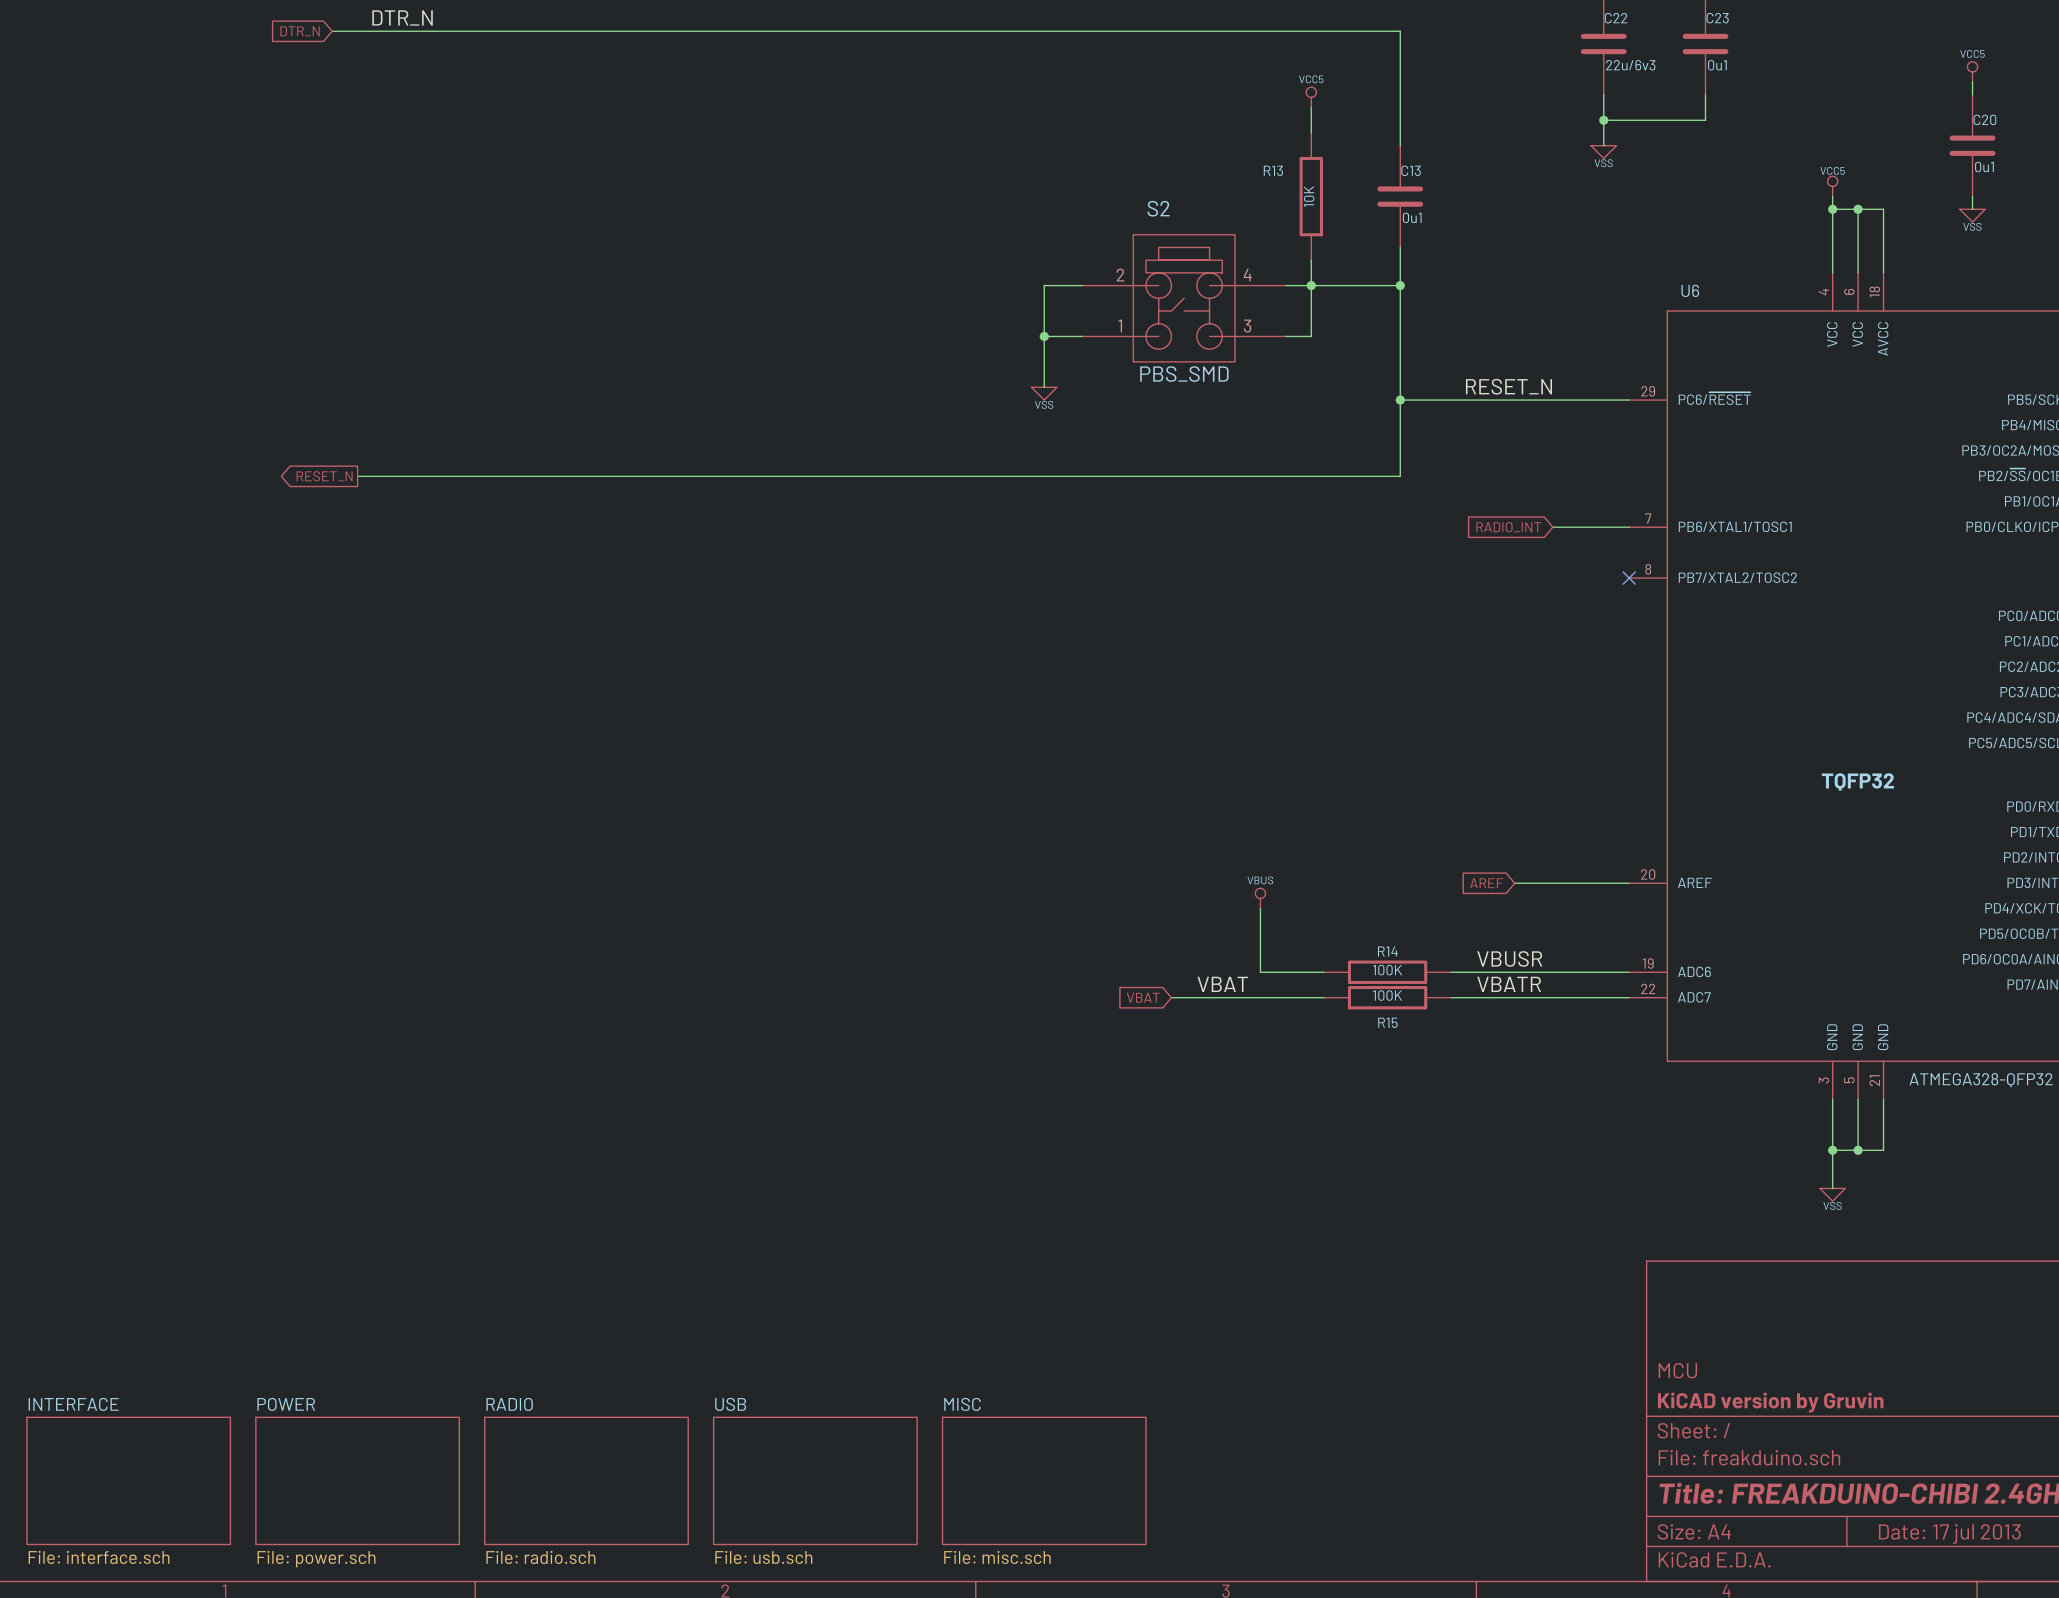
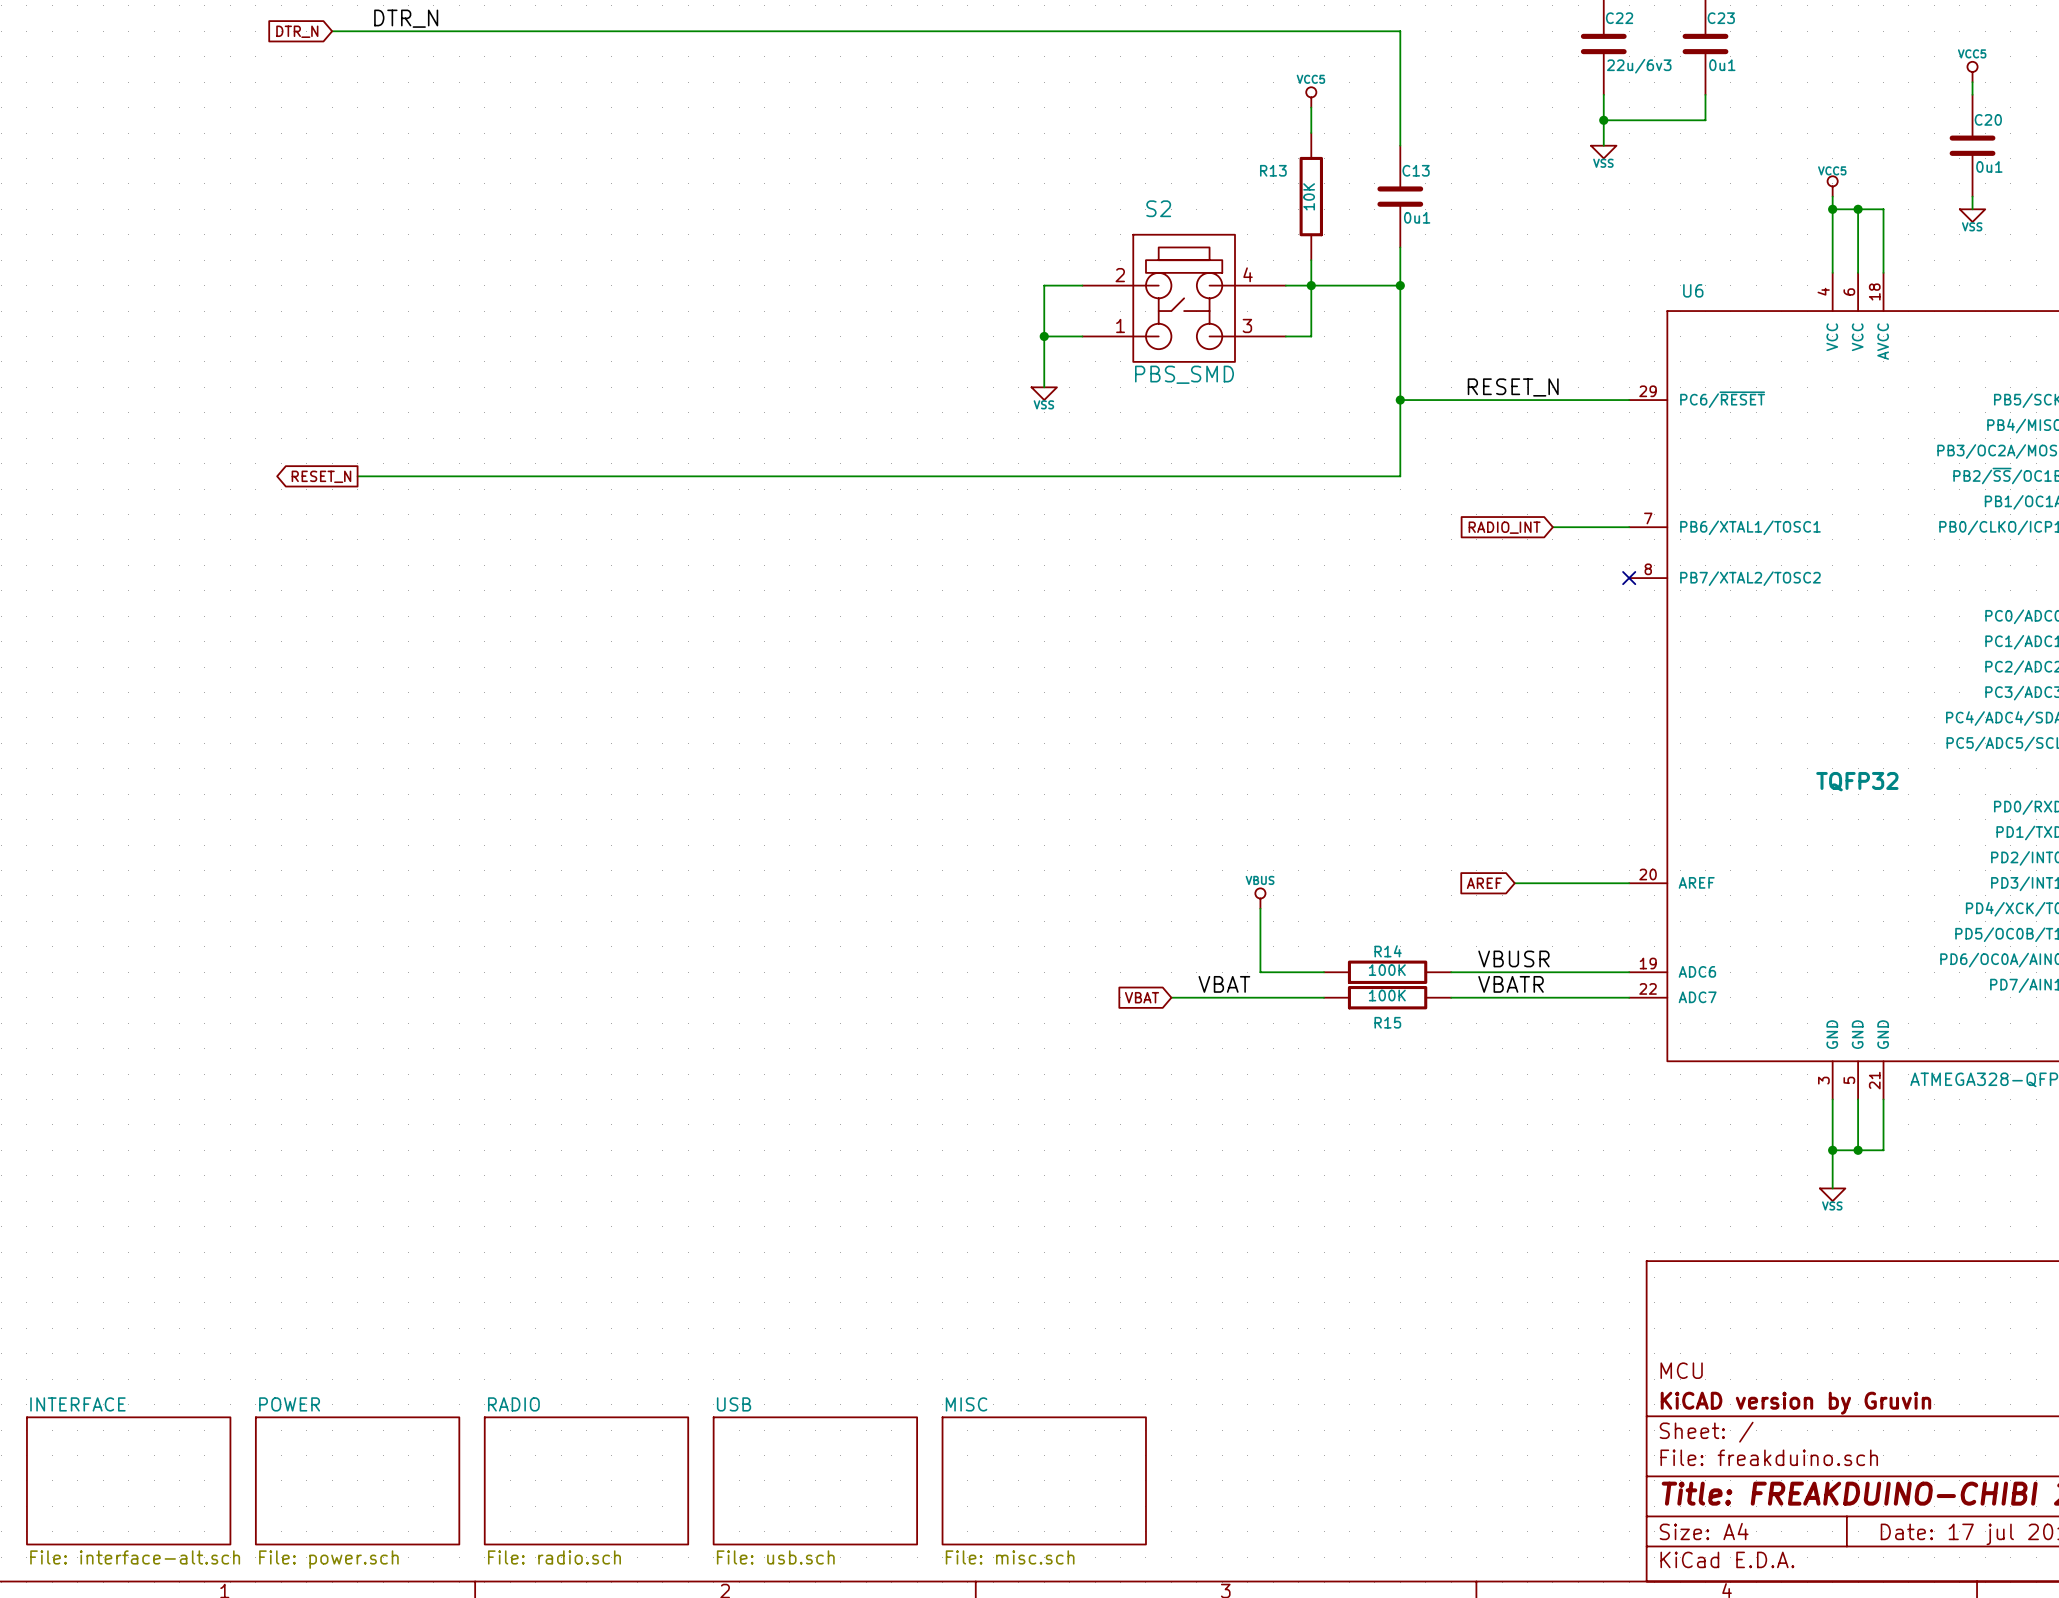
sheet INTERFACE value: File: interface.sch (99, 1557) -> File: interface-alt.sch (135, 1557)

